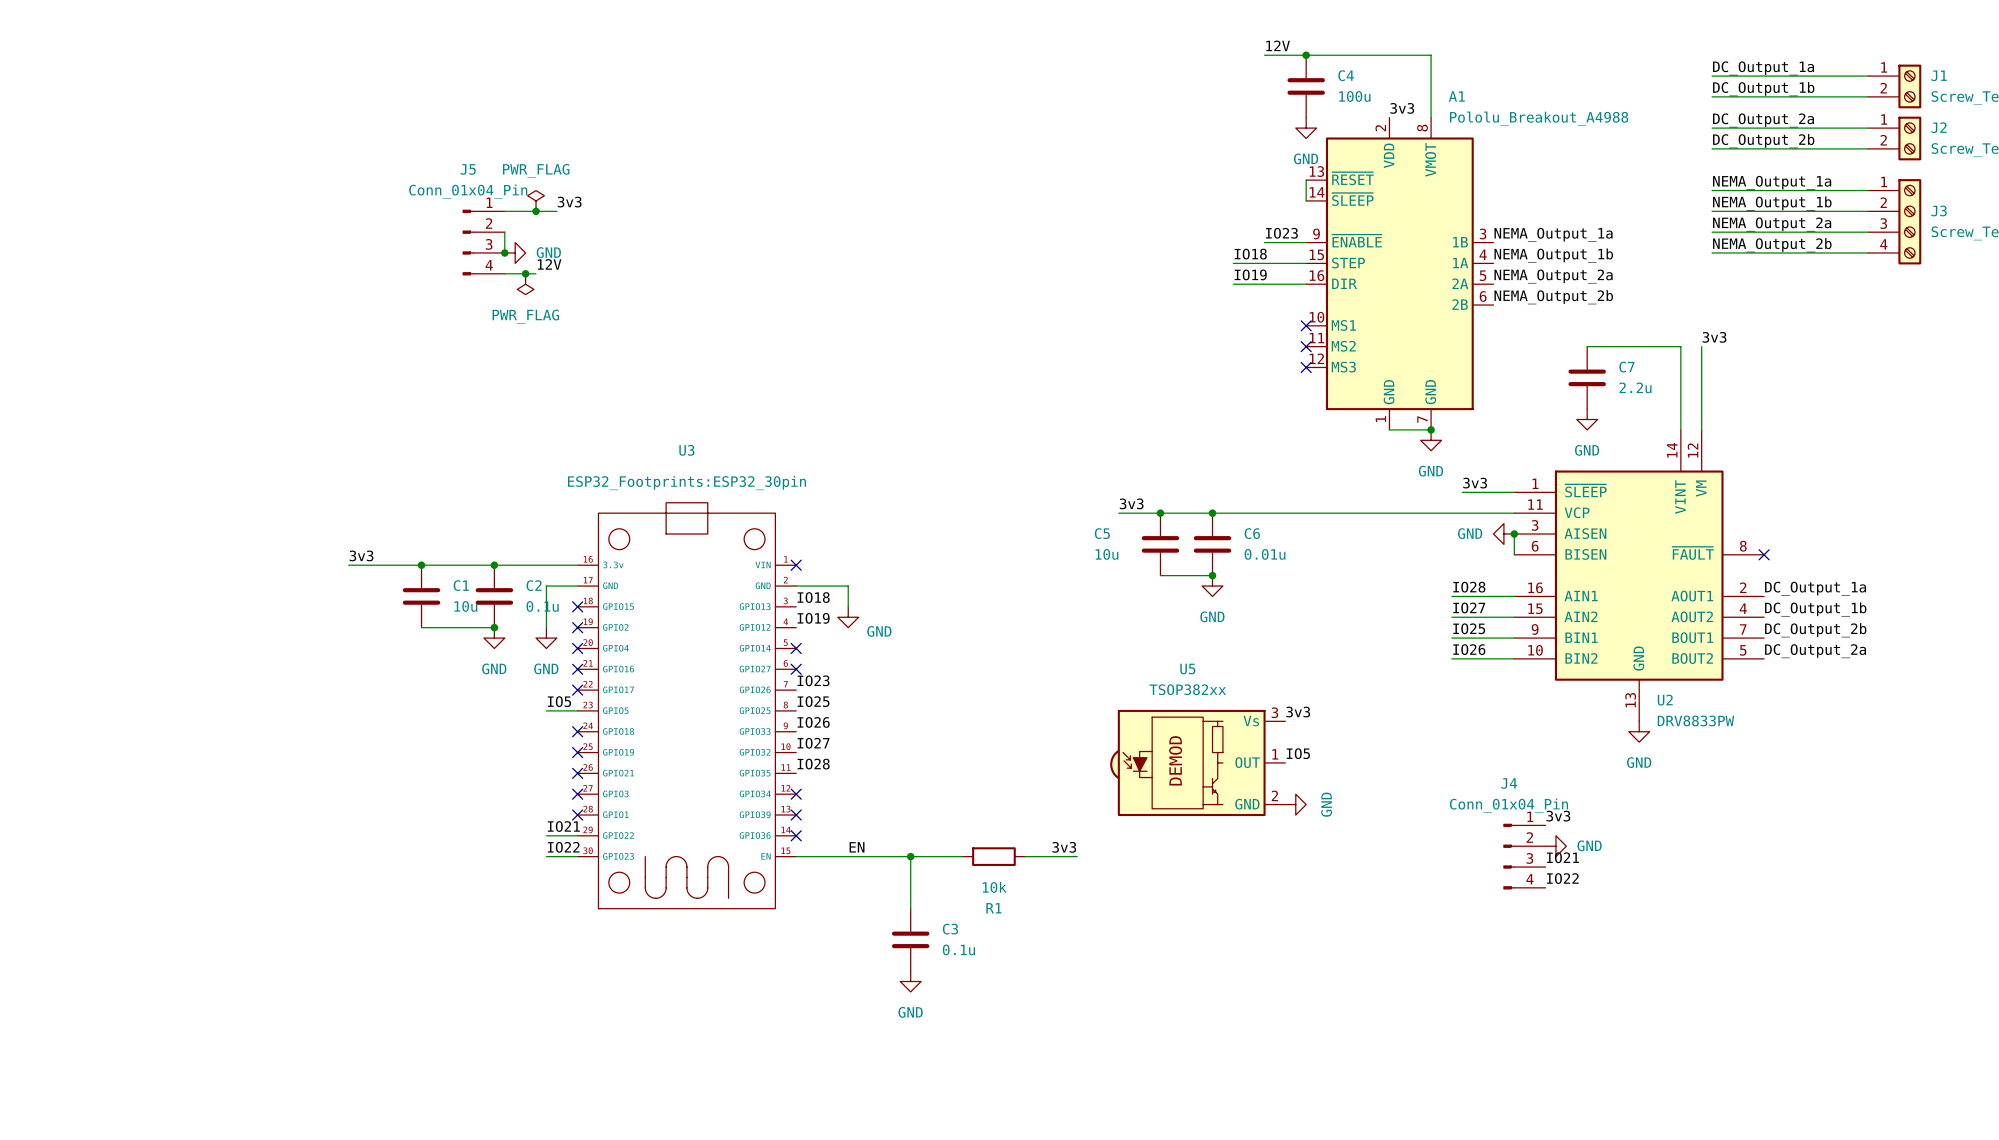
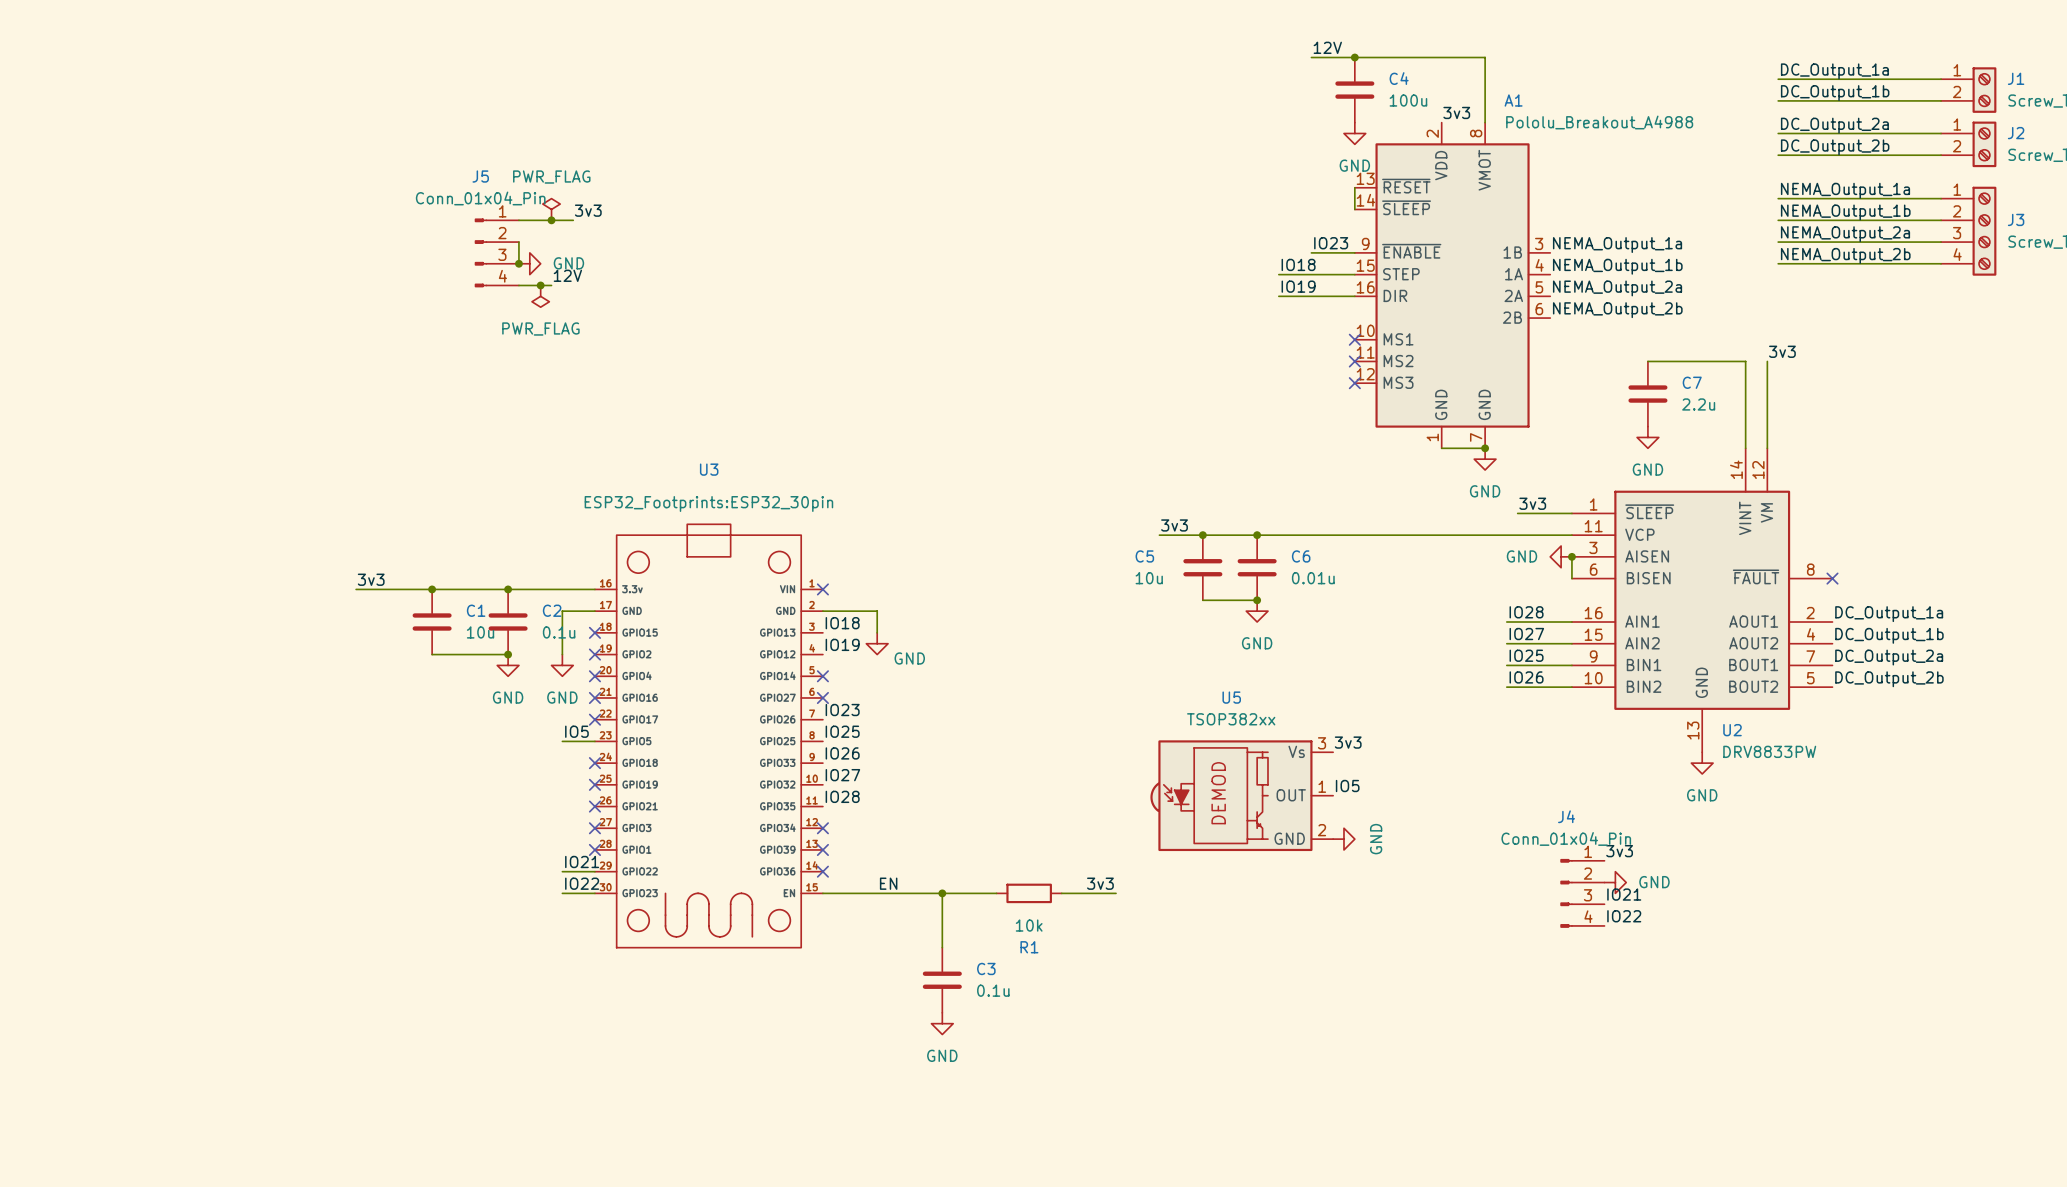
label: DC_Output_2b (1815, 630) -> DC_Output_2a (1889, 657)
label: DC_Output_2a (1815, 651) -> DC_Output_2b (1889, 679)

